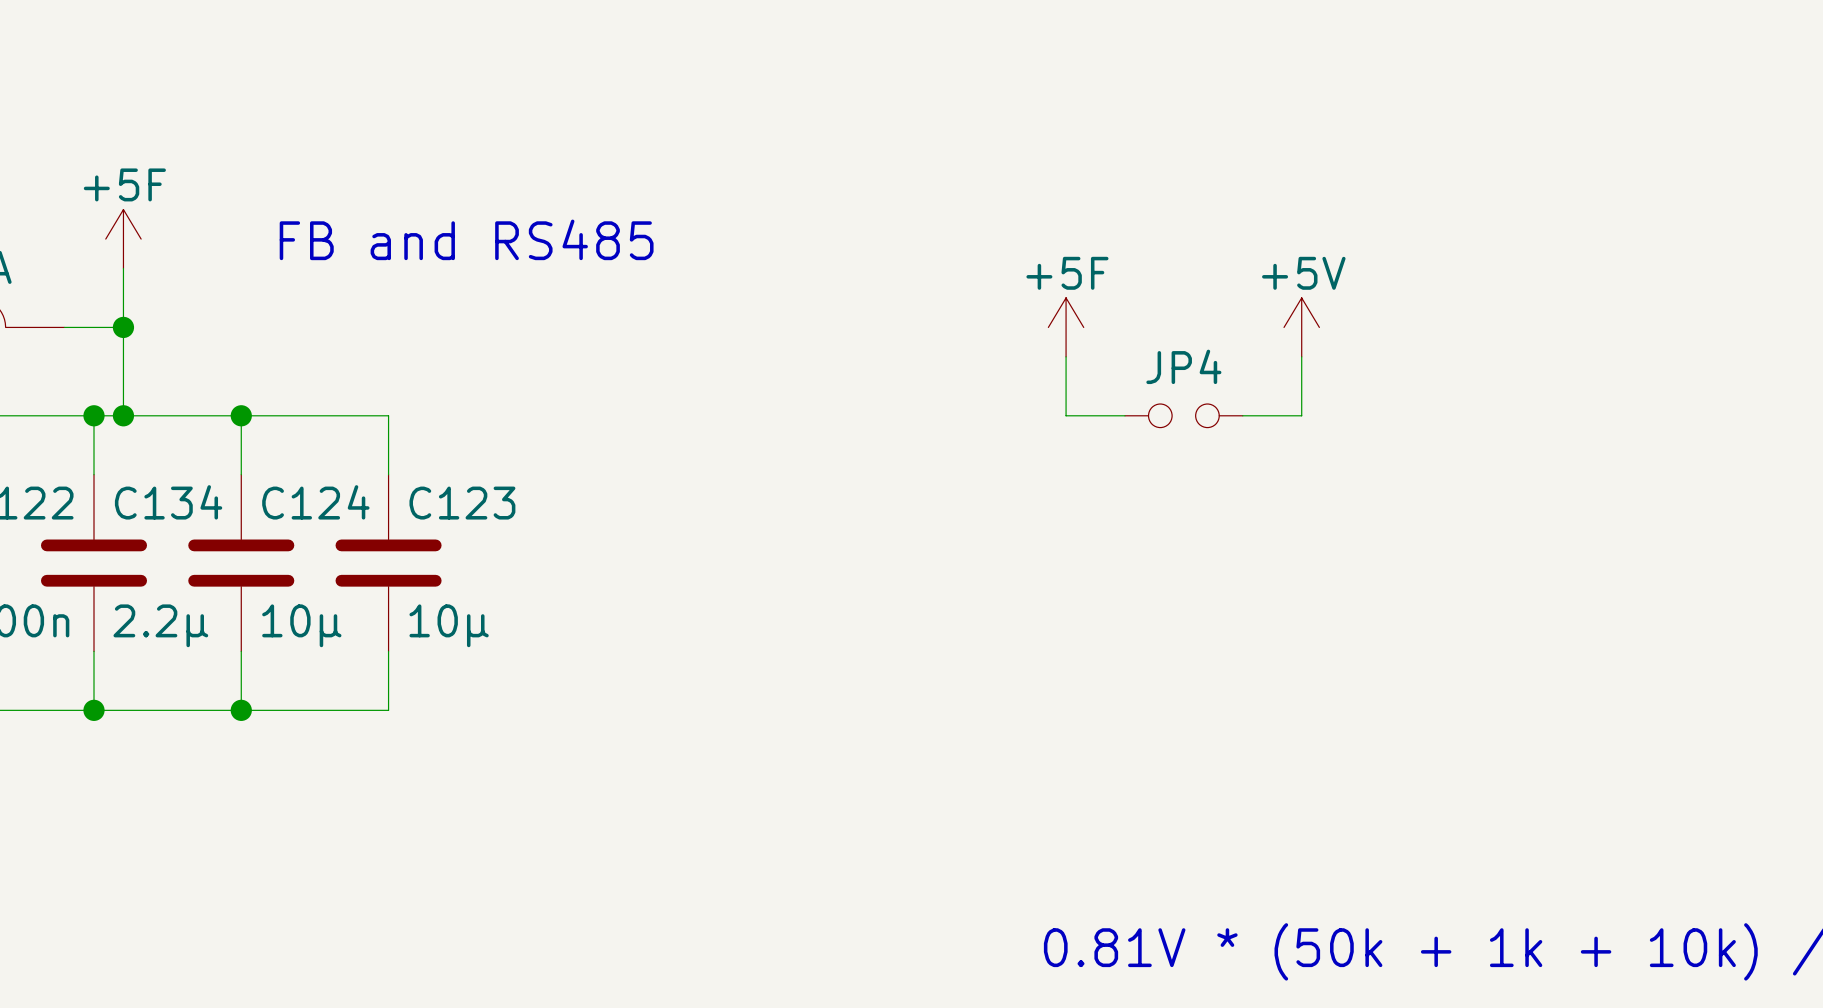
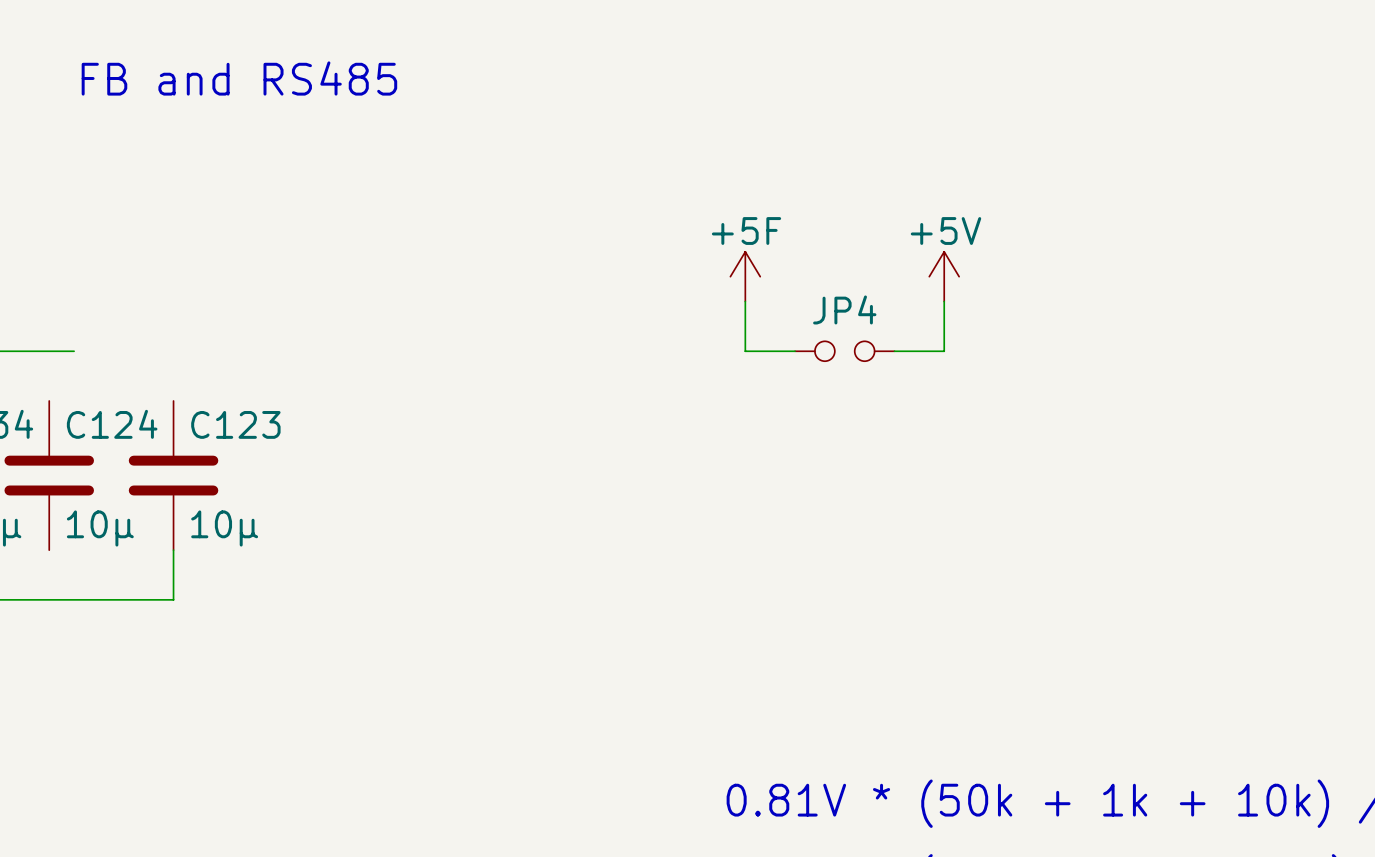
text position: FB and RS485 (466, 239) -> FB and RS485 (239, 78)
wire: (241, 415) (241, 474) -> none
junction: (241, 415) -> none
wire: (270, 415) (388, 415) (388, 474) -> none
wire: (241, 651) (241, 710) -> none
junction: (241, 710) -> none

